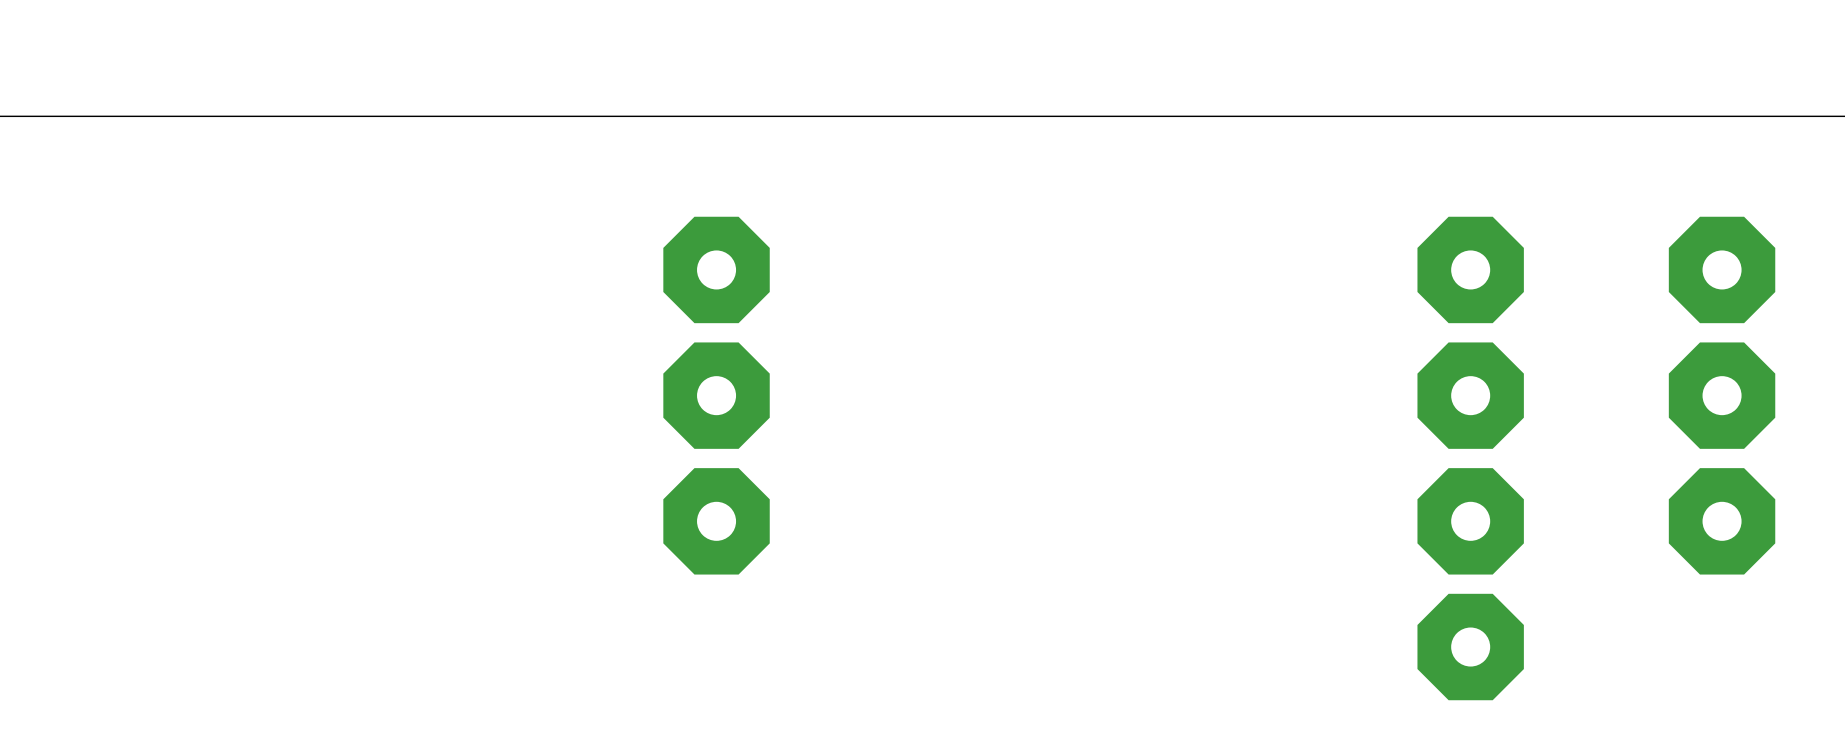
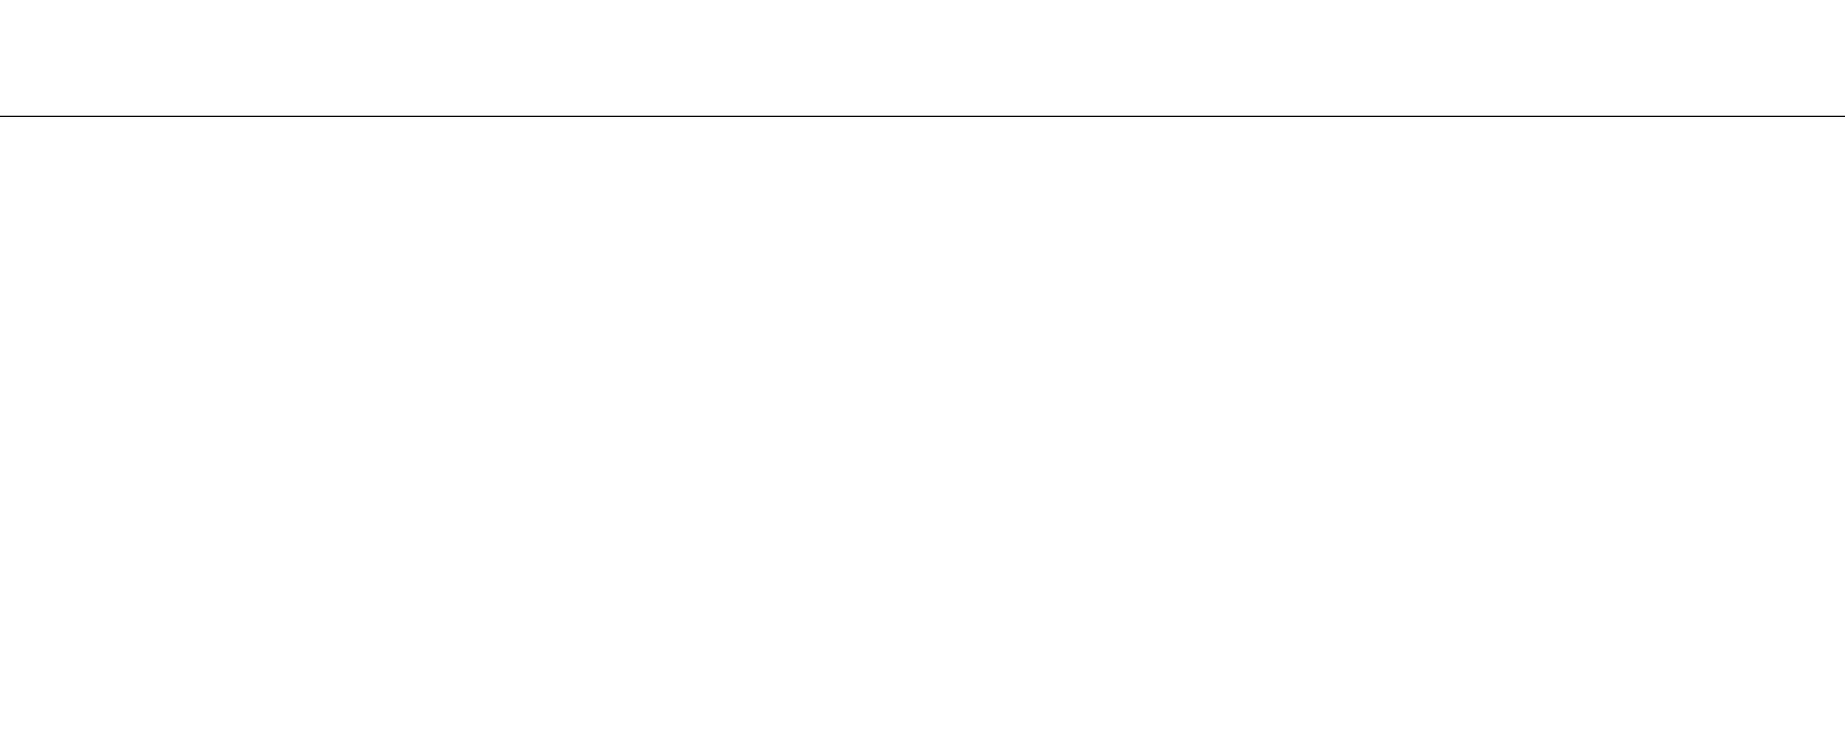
part: (716, 269) -> none
part: (1470, 269) -> none
part: (1722, 269) -> none
part: (716, 395) -> none
part: (1470, 395) -> none
part: (1722, 395) -> none
part: (716, 521) -> none
part: (1470, 521) -> none
part: (1722, 521) -> none
part: (1470, 647) -> none

